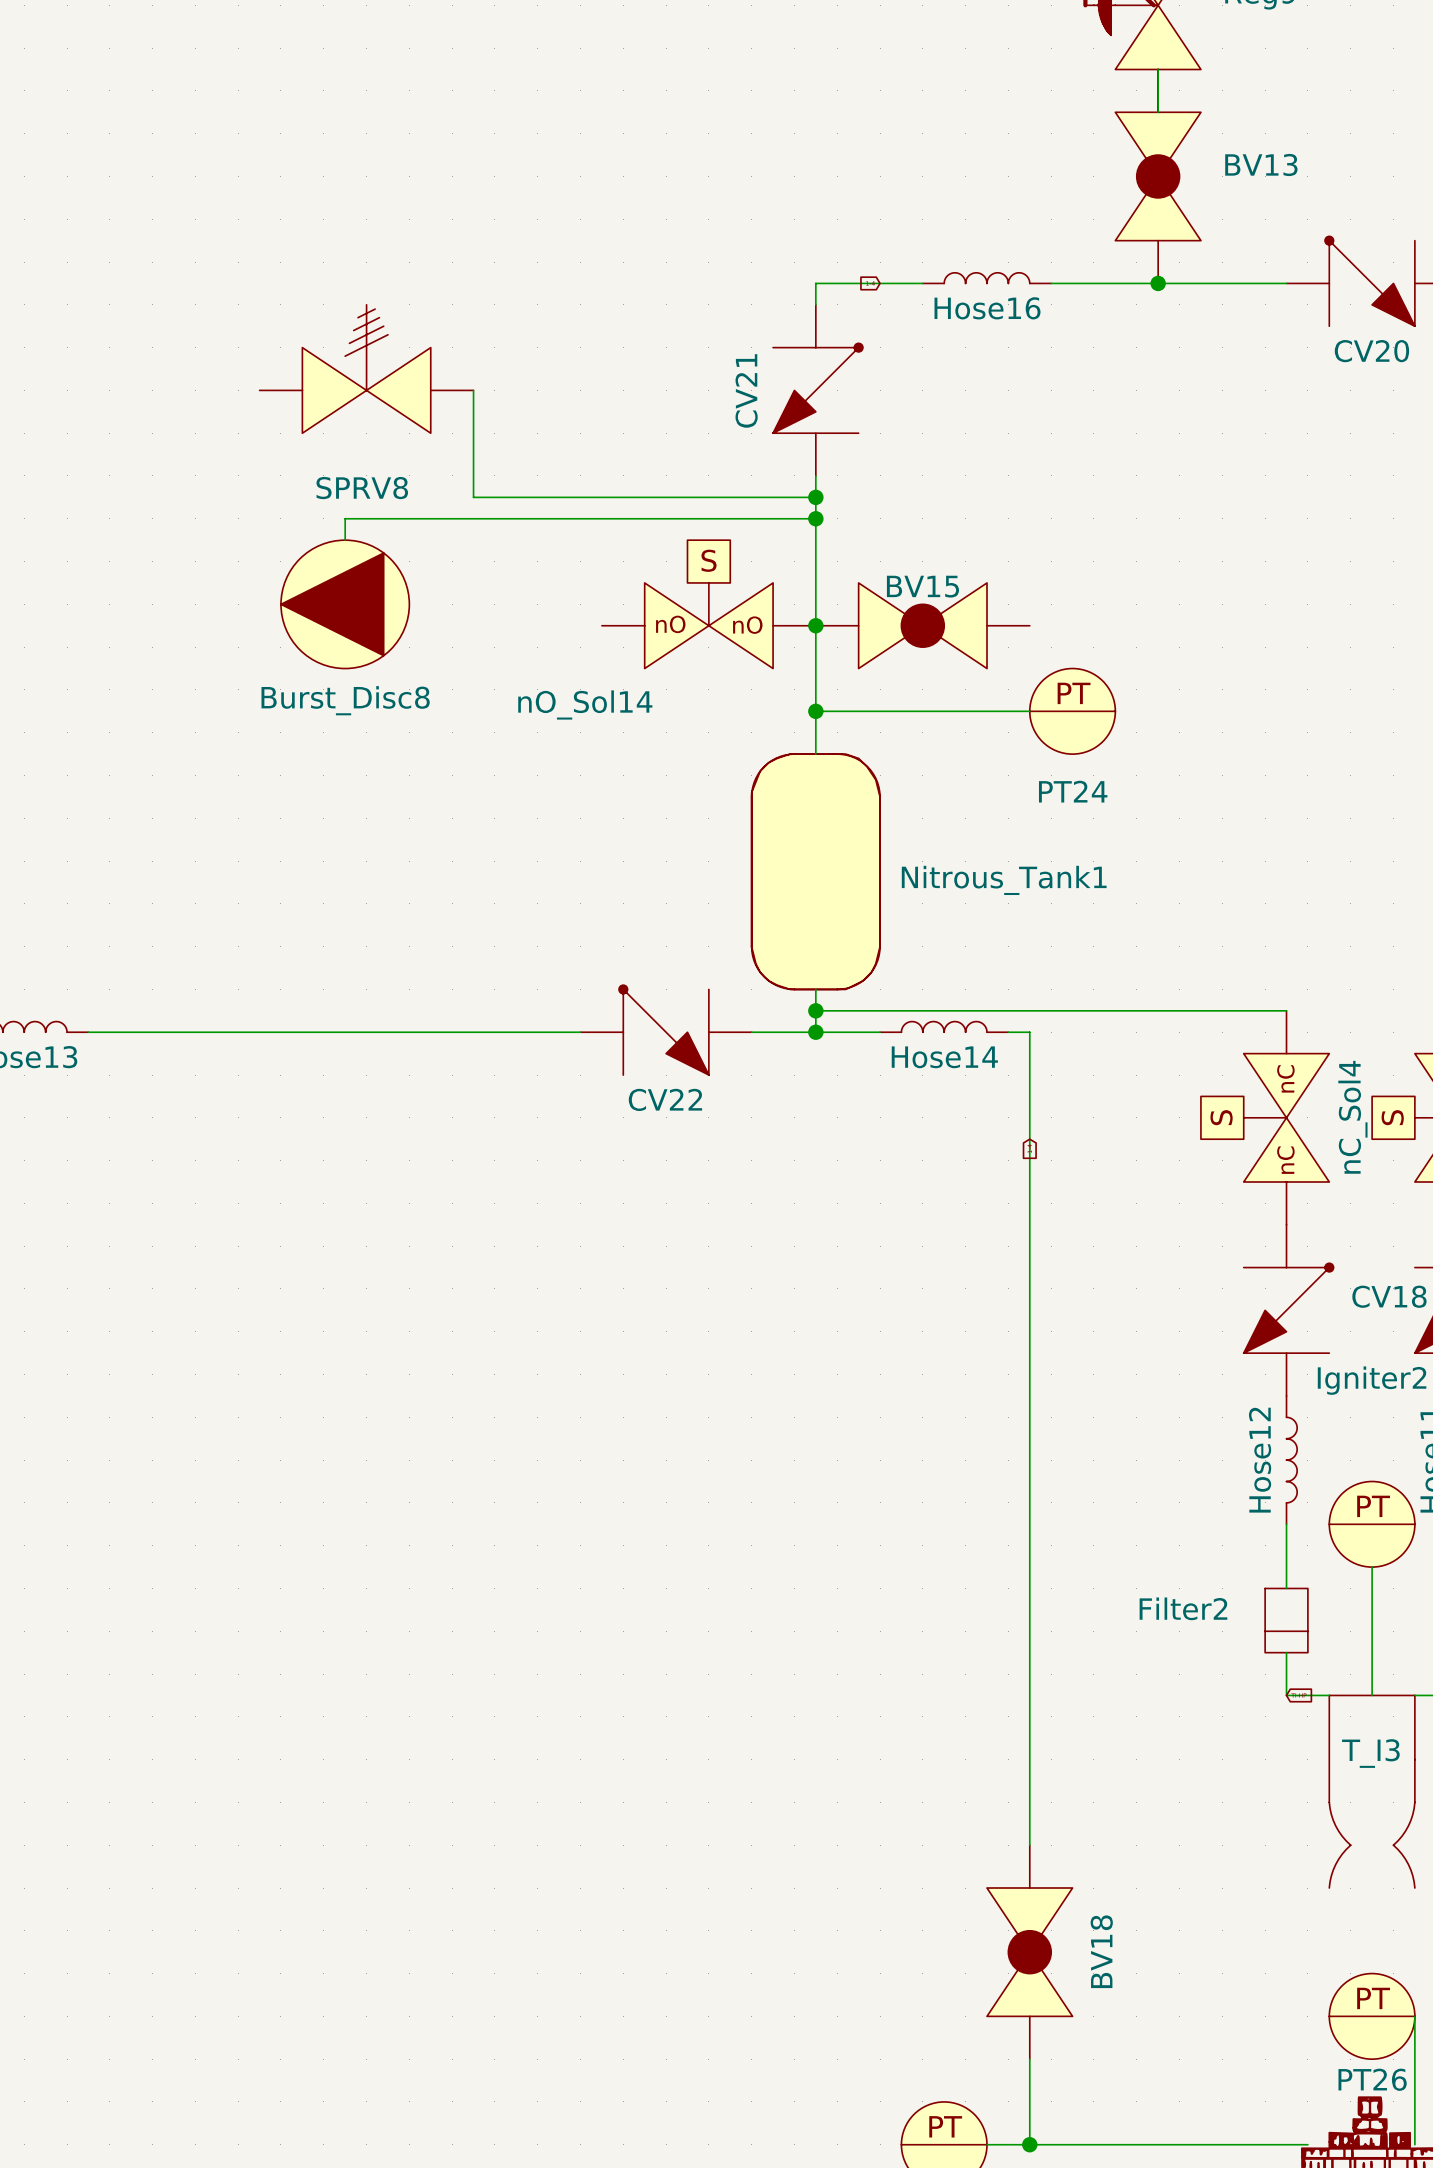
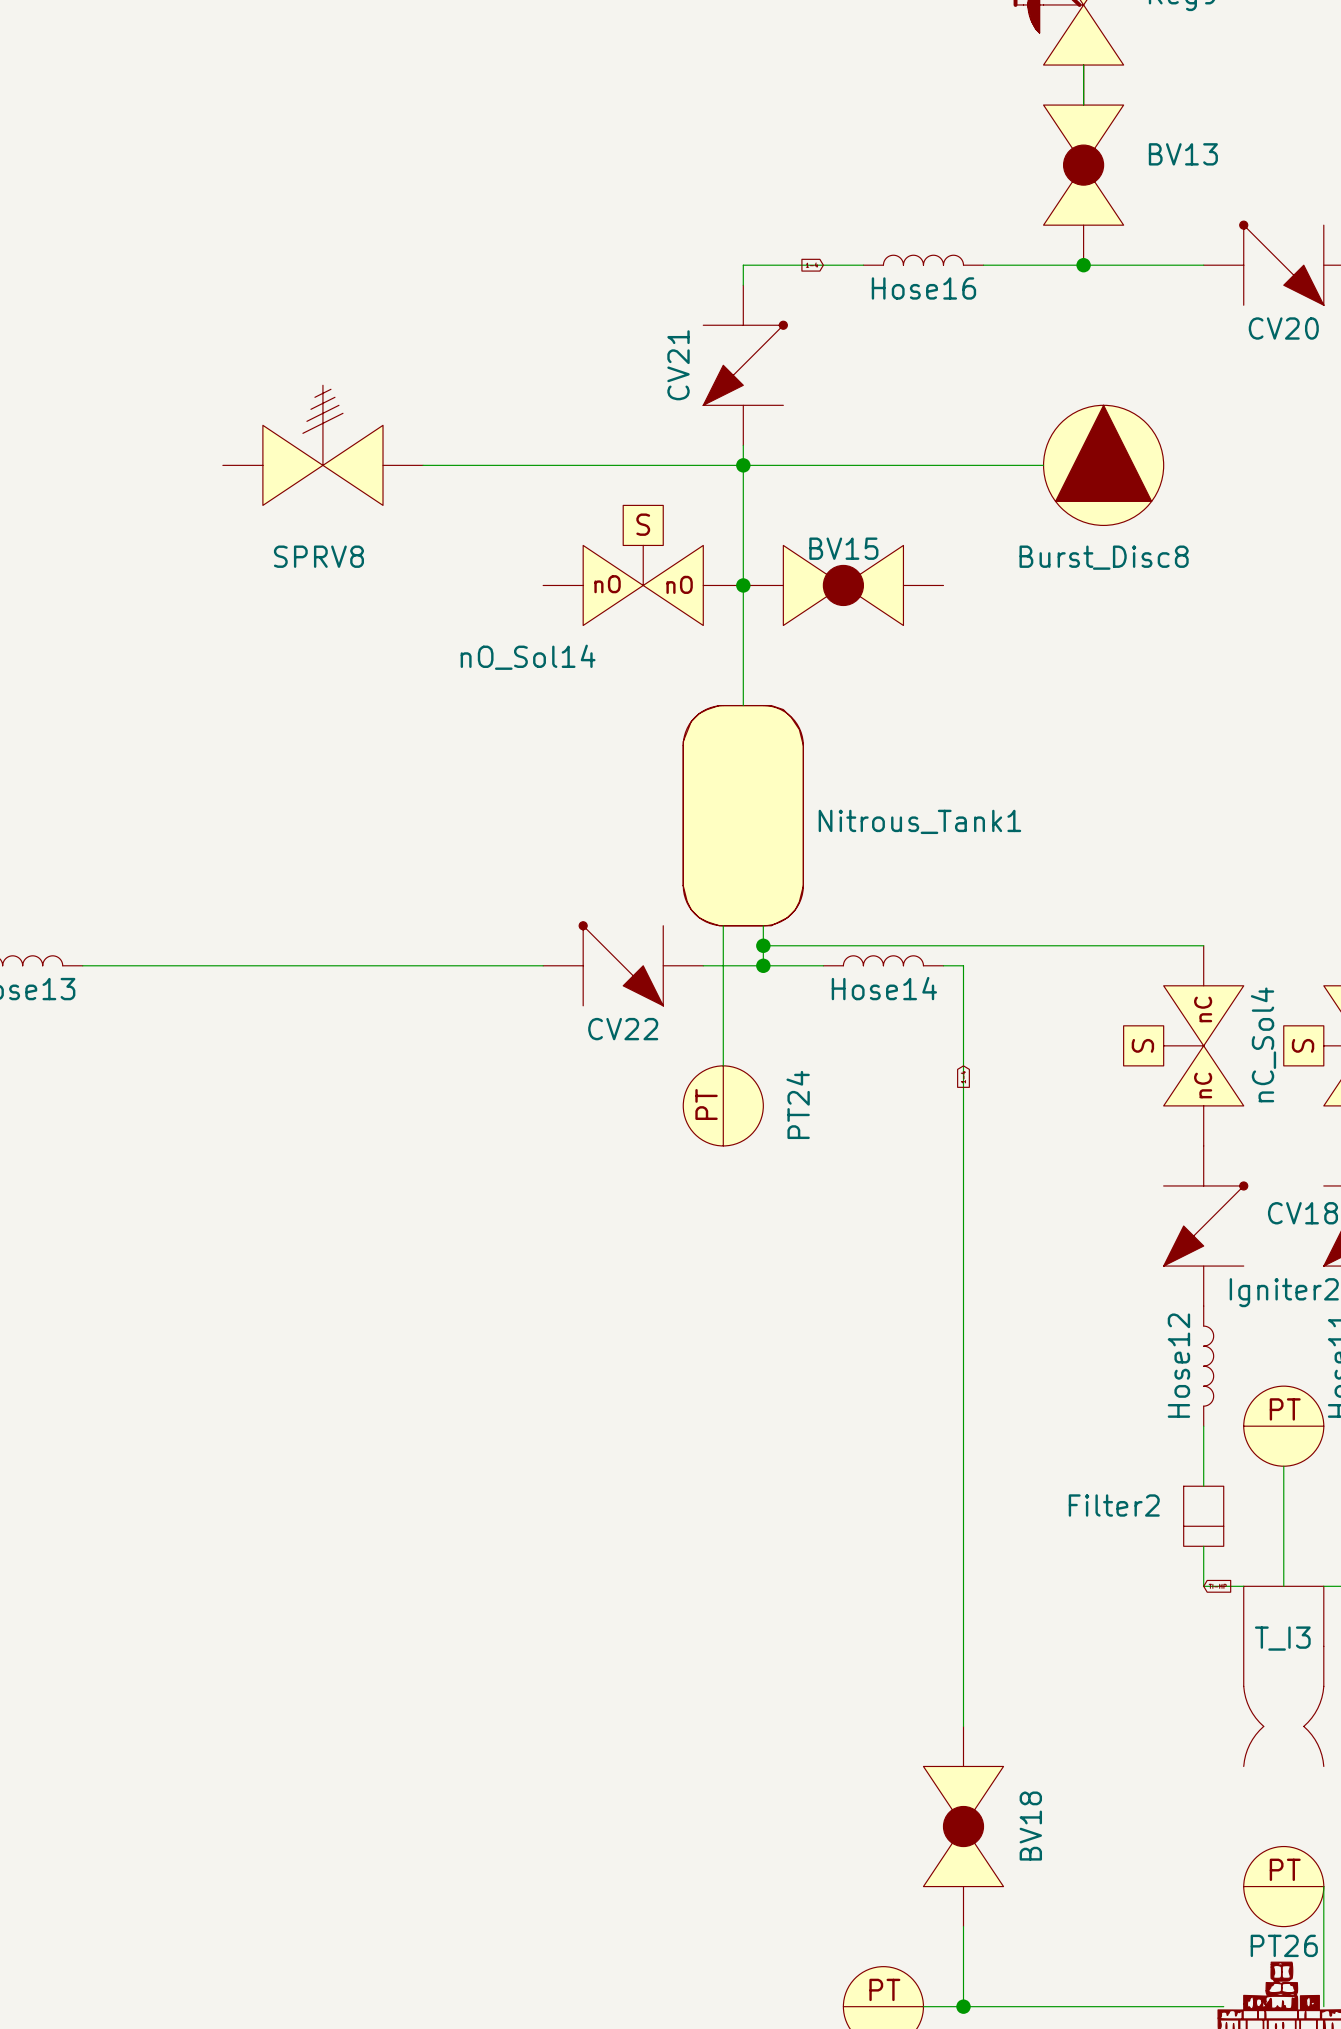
wire: (815, 283) (815, 304) -> (763, 265) (743, 265) (743, 285)
SPRV8 position: (366, 369) -> (322, 445)
wire: (473, 390) (473, 497) -> (423, 465) (443, 465)
CV21 position: (817, 390) -> (745, 365)
wire: (815, 475) (815, 754) -> (743, 445) (743, 705)
junction: none -> (743, 465)
wire: none -> (763, 465) (1043, 465)
junction: (815, 497) -> none
wire: (815, 518) (345, 518) (345, 540) -> none
junction: (815, 518) -> none
Burst_Disc8 rotation: 0° (345, 604) -> 90° clockwise (1103, 465)
Burst_Disc8 position: (345, 604) -> (1103, 465)
nO_Sol14 position: (708, 604) -> (643, 565)
junction position: (815, 625) -> (743, 585)
BV15 position: (922, 625) -> (843, 585)
wire: (815, 711) (1029, 711) -> none
junction: (815, 711) -> none
PT24 rotation: 0° (1072, 711) -> 90° counterclockwise (723, 1105)
PT24 position: (1072, 711) -> (723, 1105)
Nitrous_Tank1 position: (815, 871) -> (743, 815)
wire: none -> (723, 925) (723, 1065)

